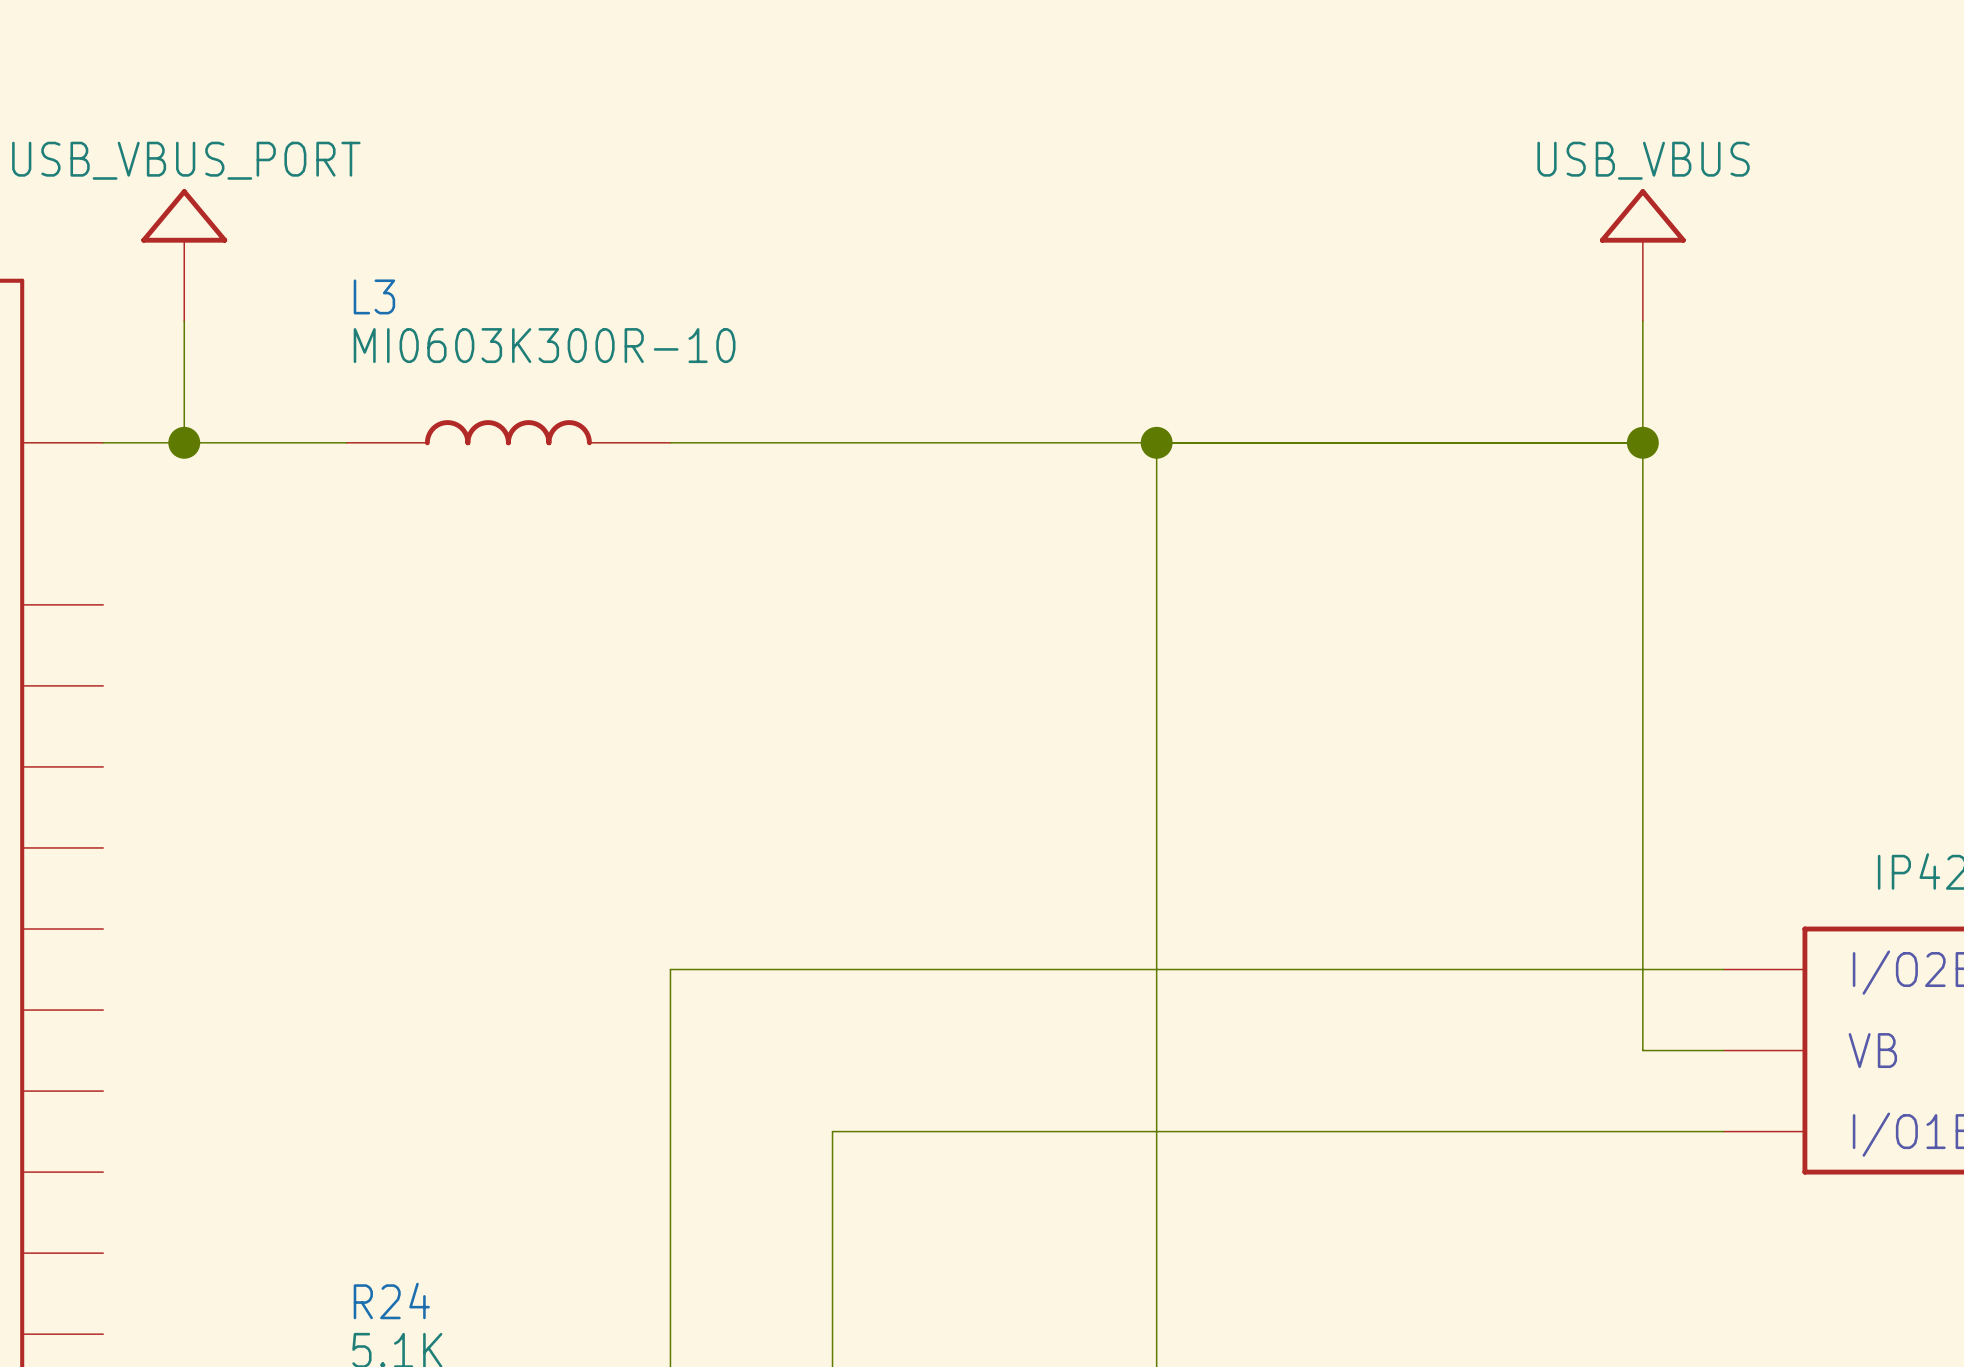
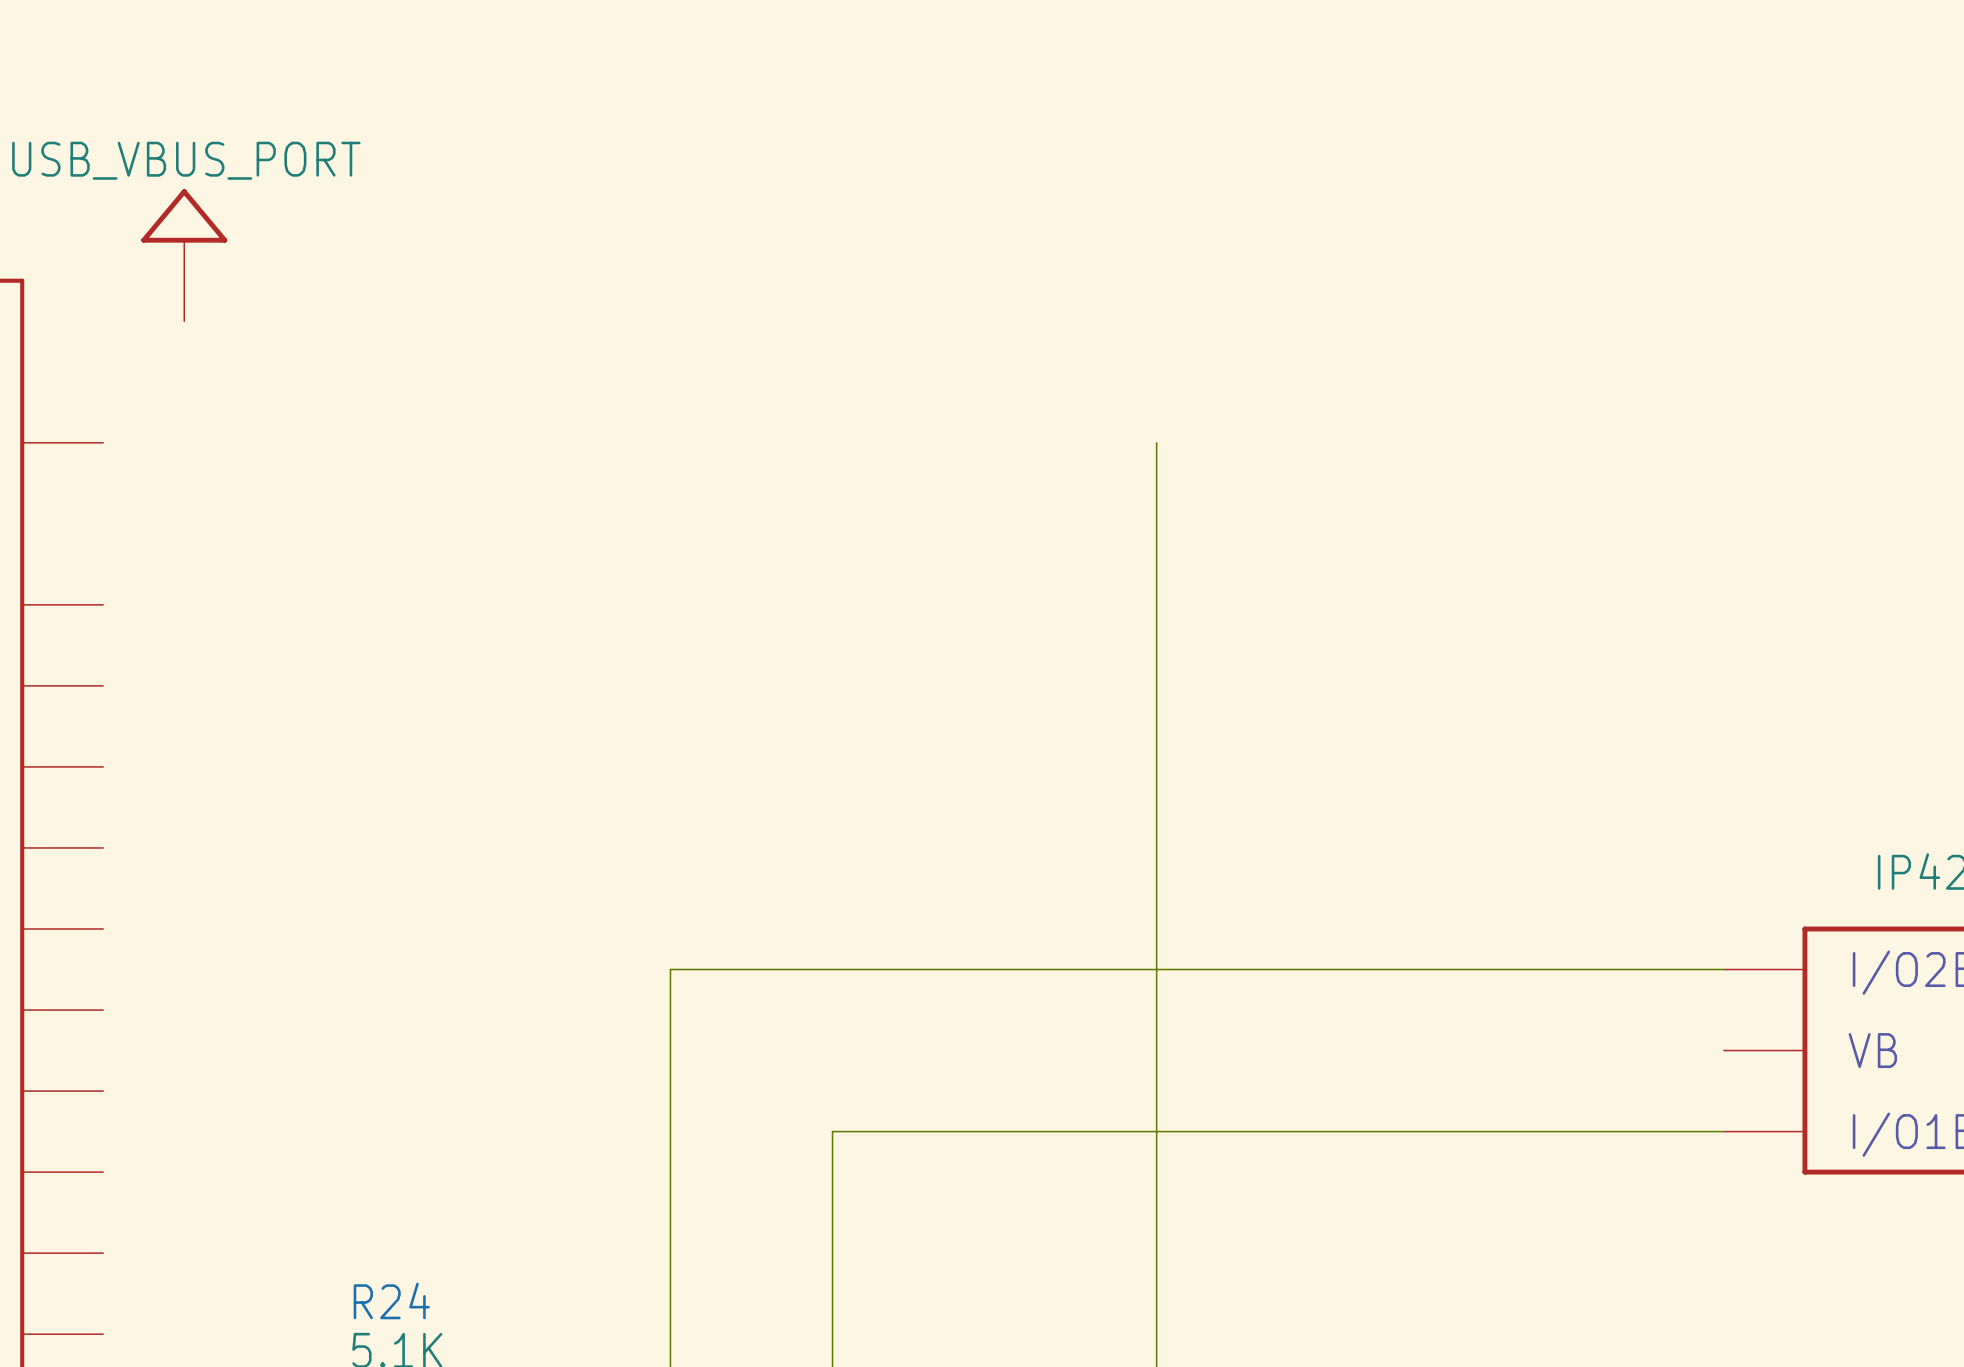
power symbol: USB_VBUS (1642, 255) -> none
wire: (184, 321) (184, 442) -> none
wire: (1642, 321) (1642, 1050) (1723, 1050) -> none
L3: MI0603K300R-10 (508, 432) -> none
wire: (103, 442) (346, 442) -> none
junction: (184, 442) -> none
wire: (670, 442) (1642, 442) -> none
junction: (1156, 442) -> none
junction: (1642, 442) -> none

